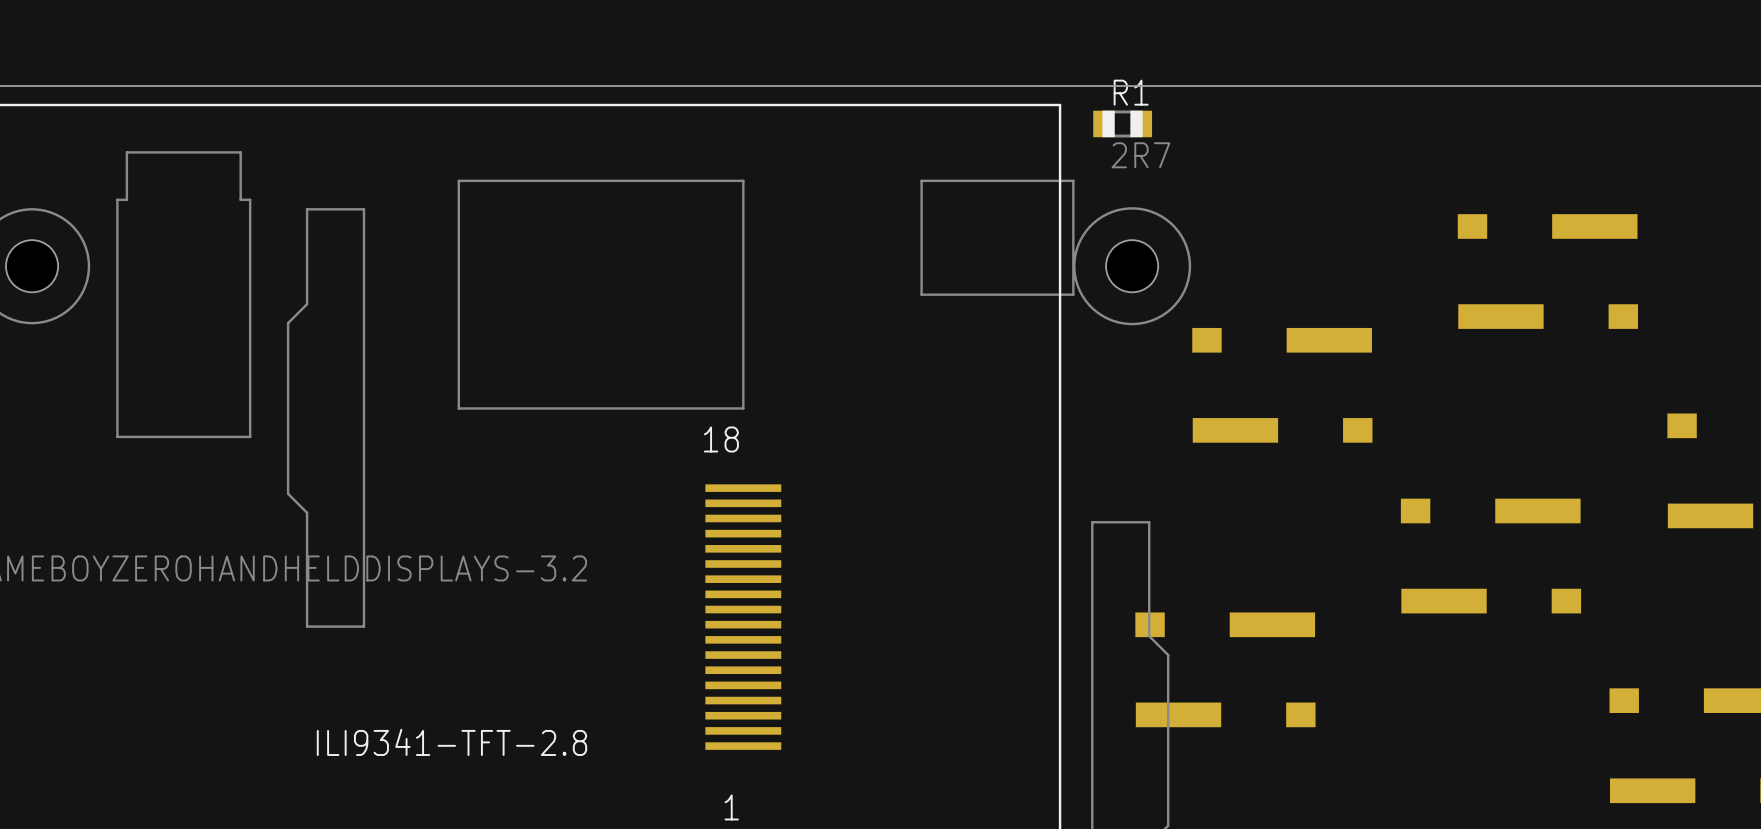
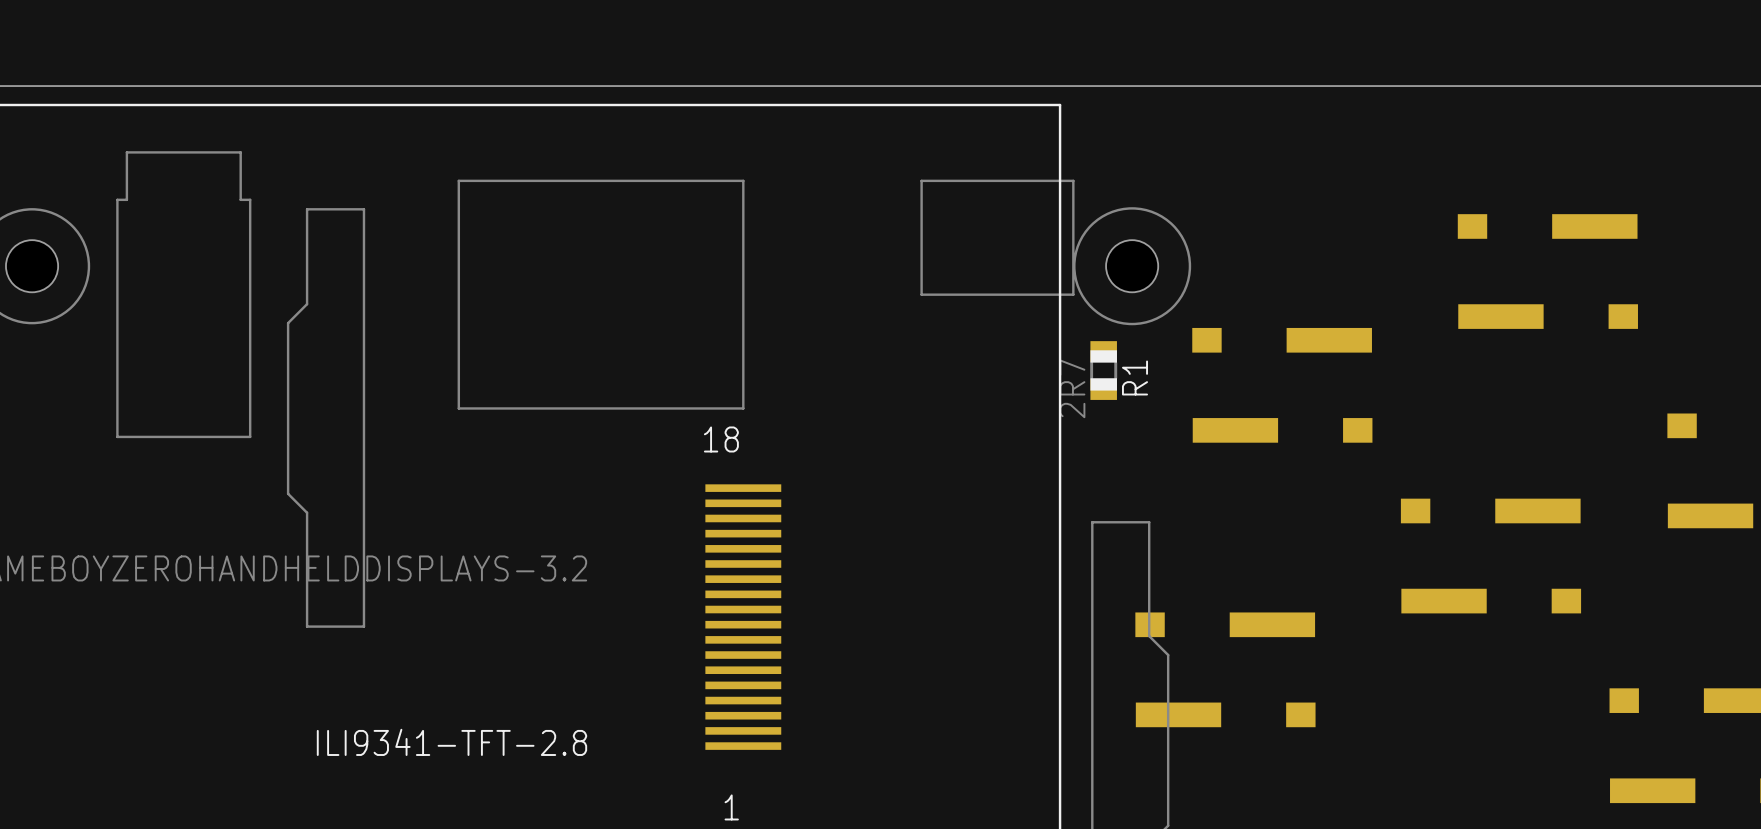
R1 rotation: 0° (1122, 123) -> 90° clockwise (1103, 370)
R1 position: (1122, 123) -> (1103, 370)

